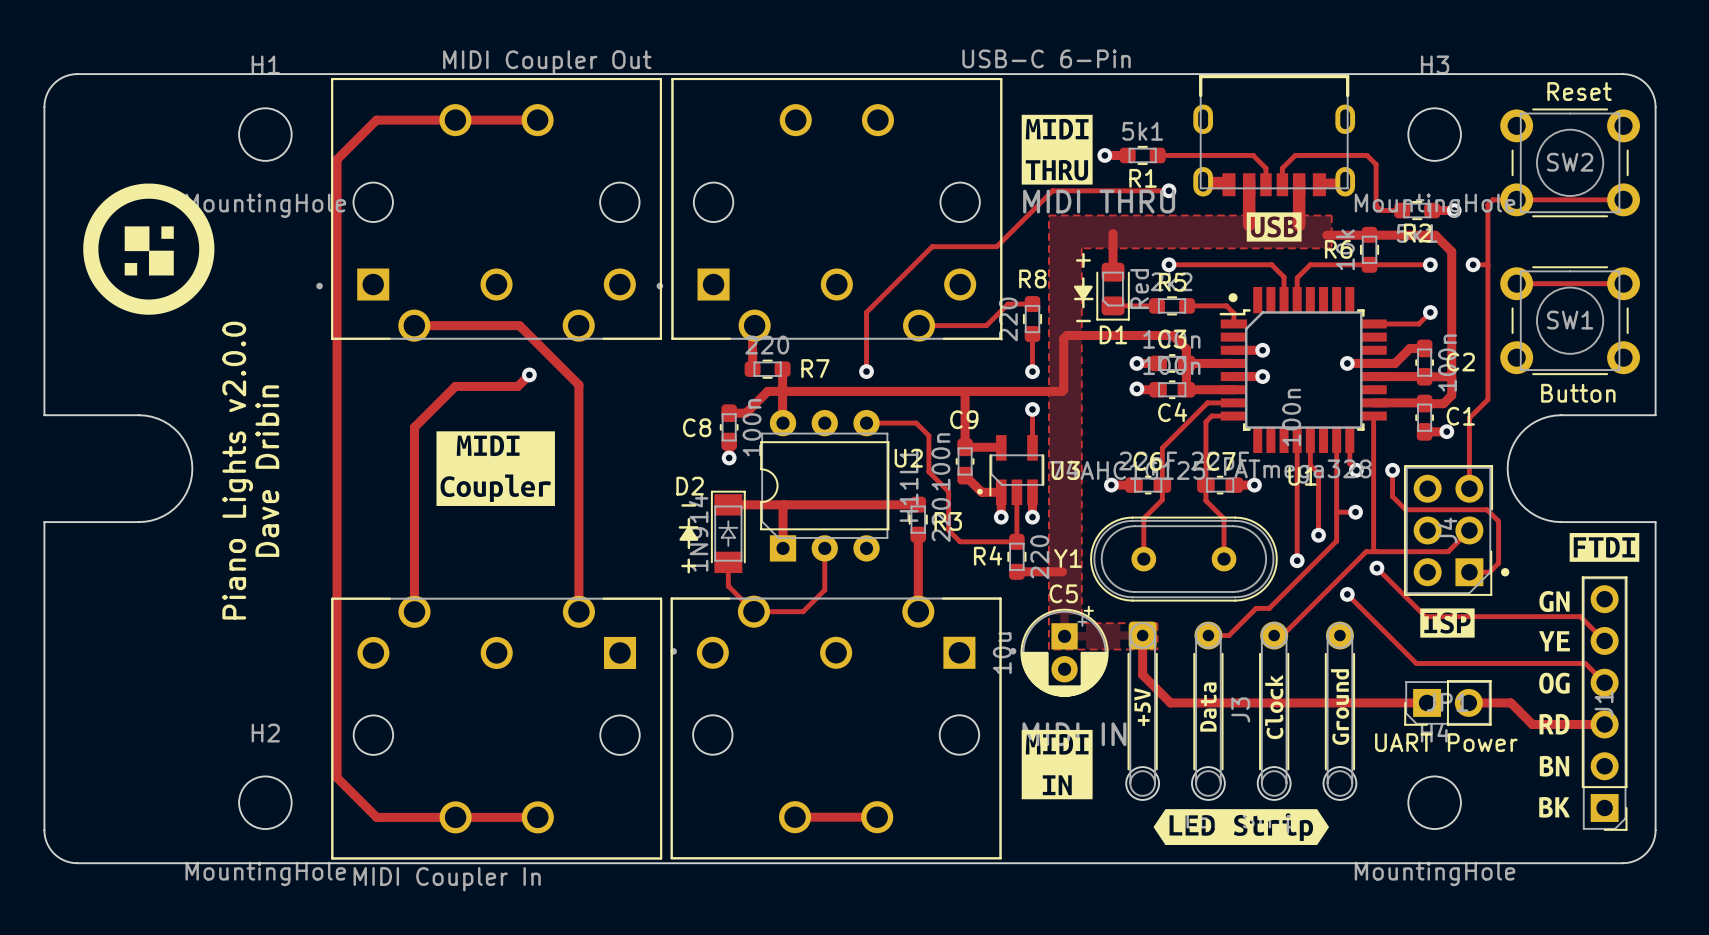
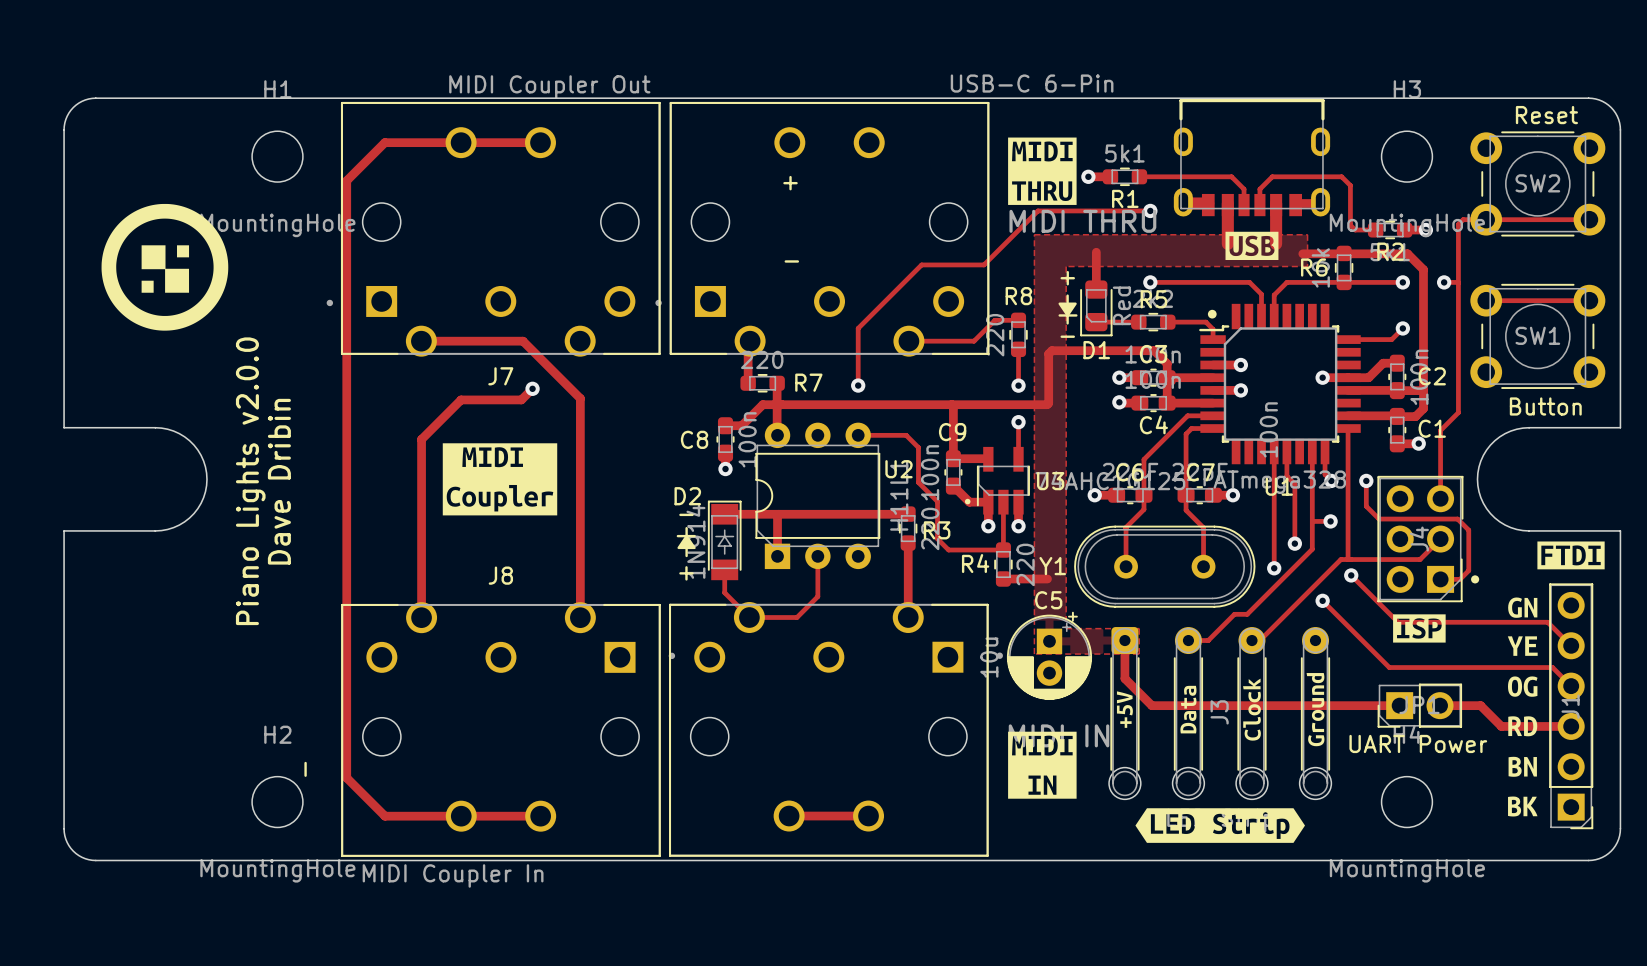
text: none -> + (790, 183)
text: none -> - (791, 261)
J7 name: none -> J7 (500, 376)
J8 name: none -> J8 (500, 575)
line: none -> (305, 763) (305, 775)

